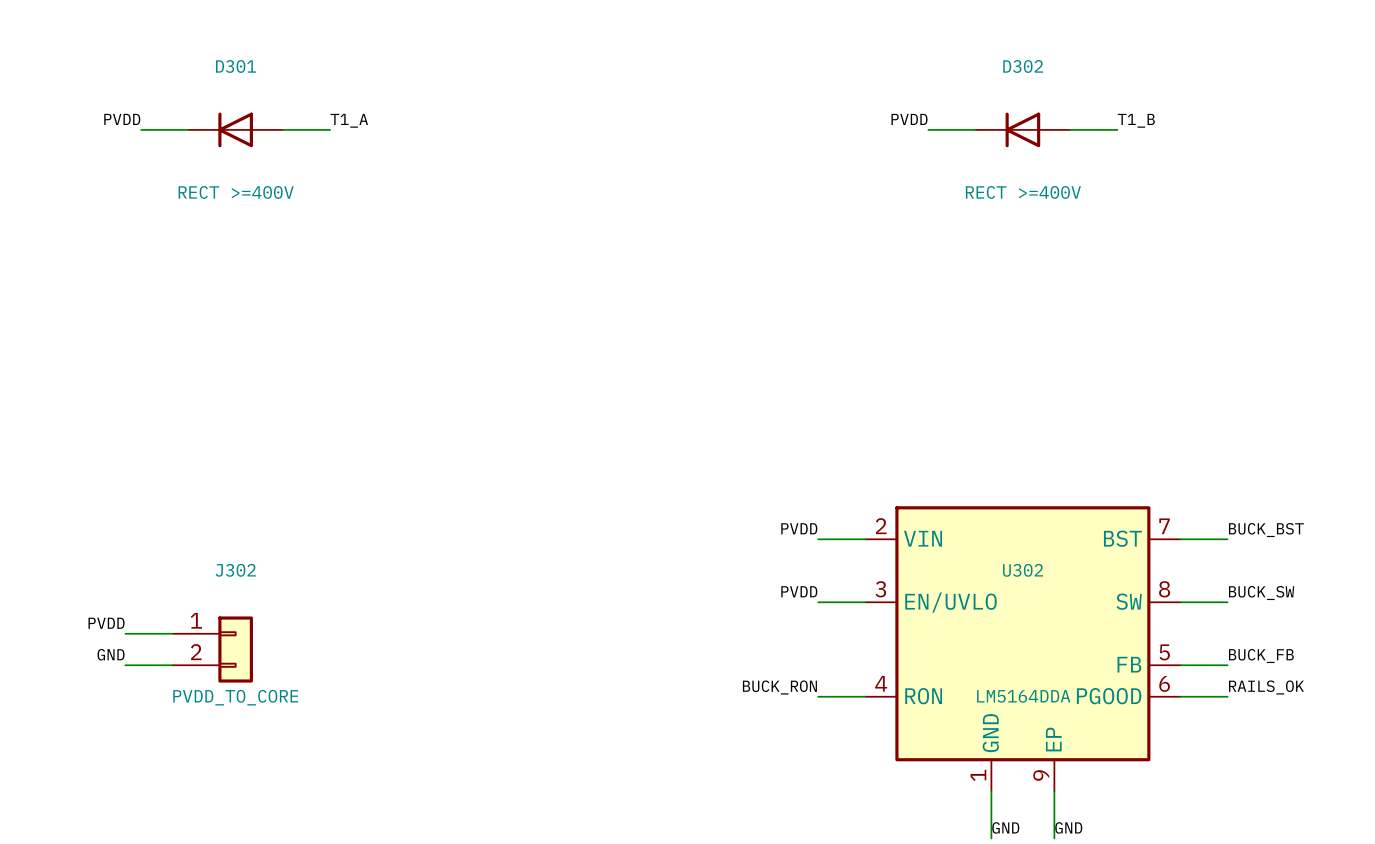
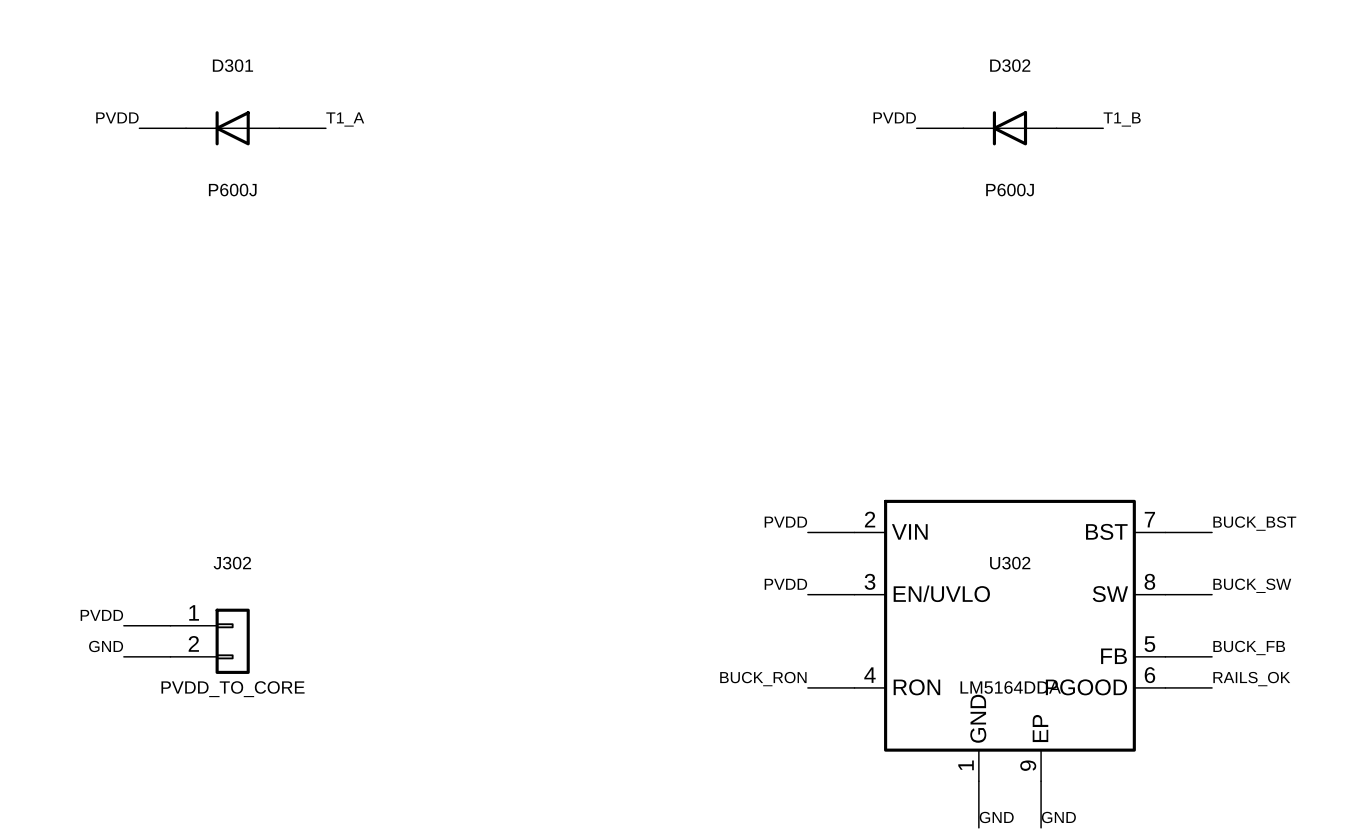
D301 value: RECT >=400V (236, 192) -> P600J (232, 190)
D302 value: RECT >=400V (1023, 192) -> P600J (1010, 190)

